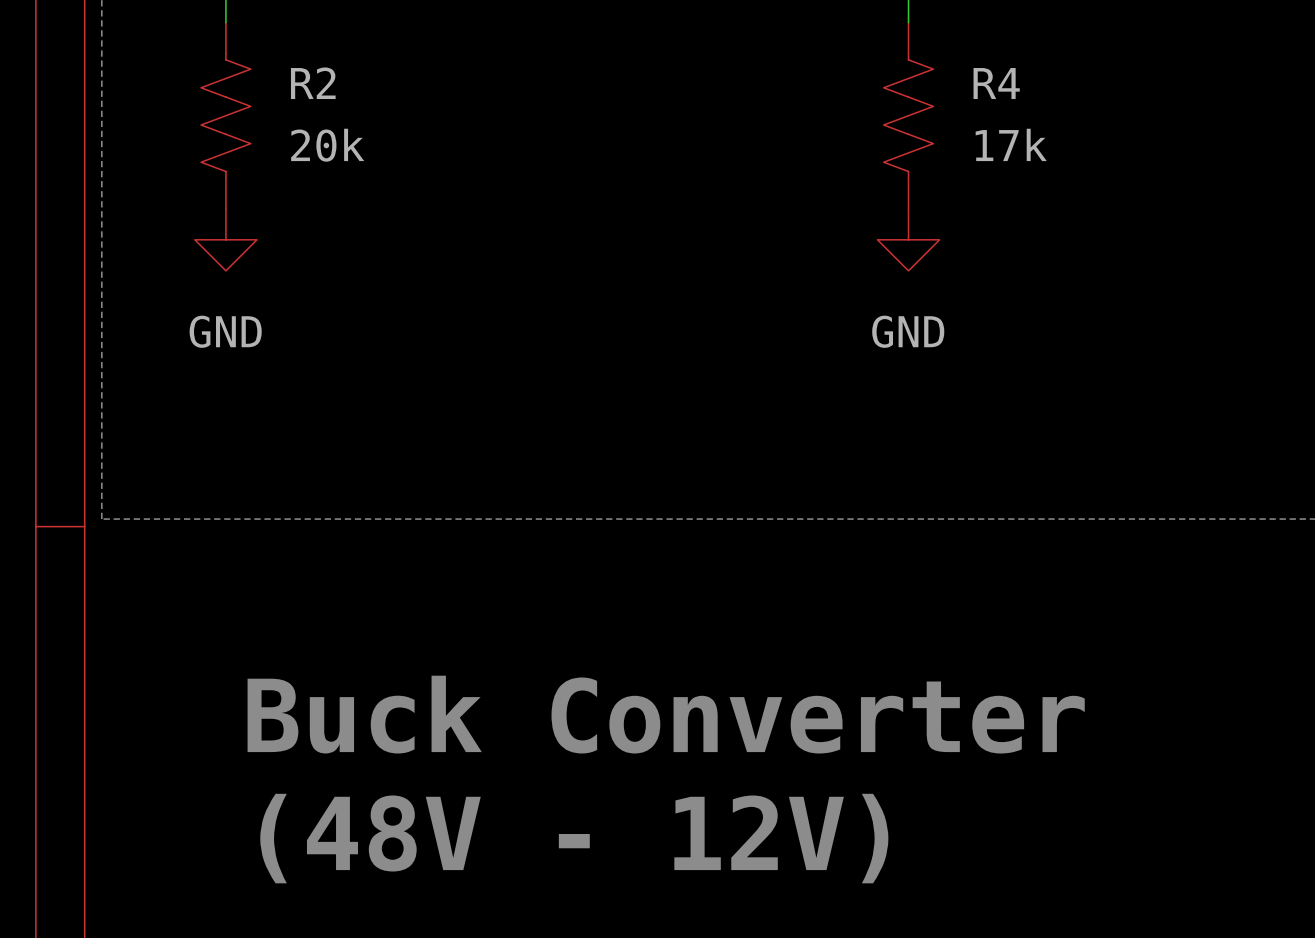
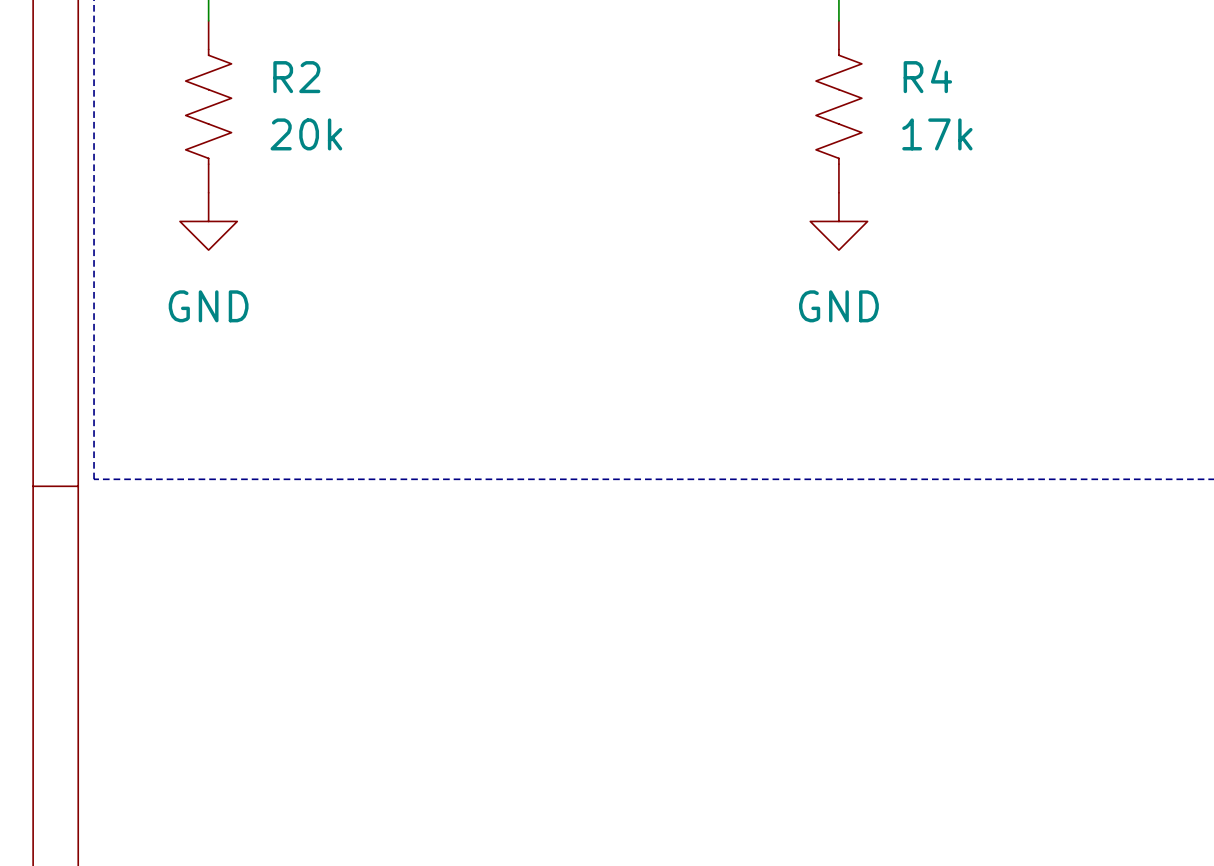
text: Buck Converter (666, 714) -> none
text: (48V - 12V) (574, 838) -> none

